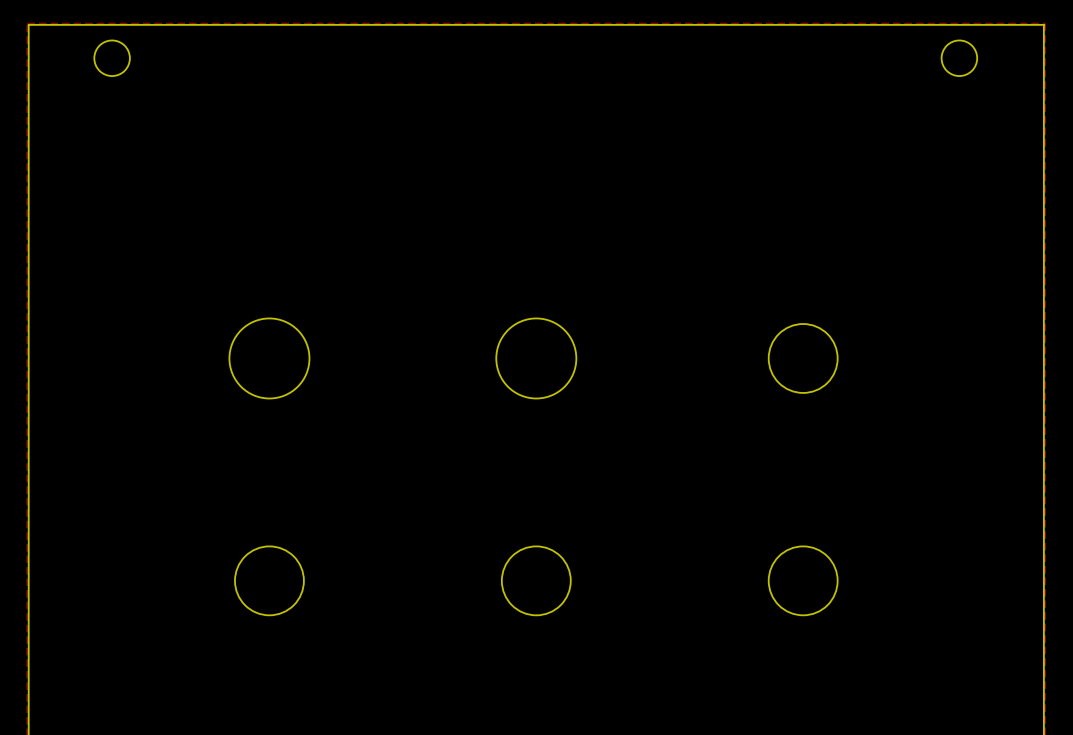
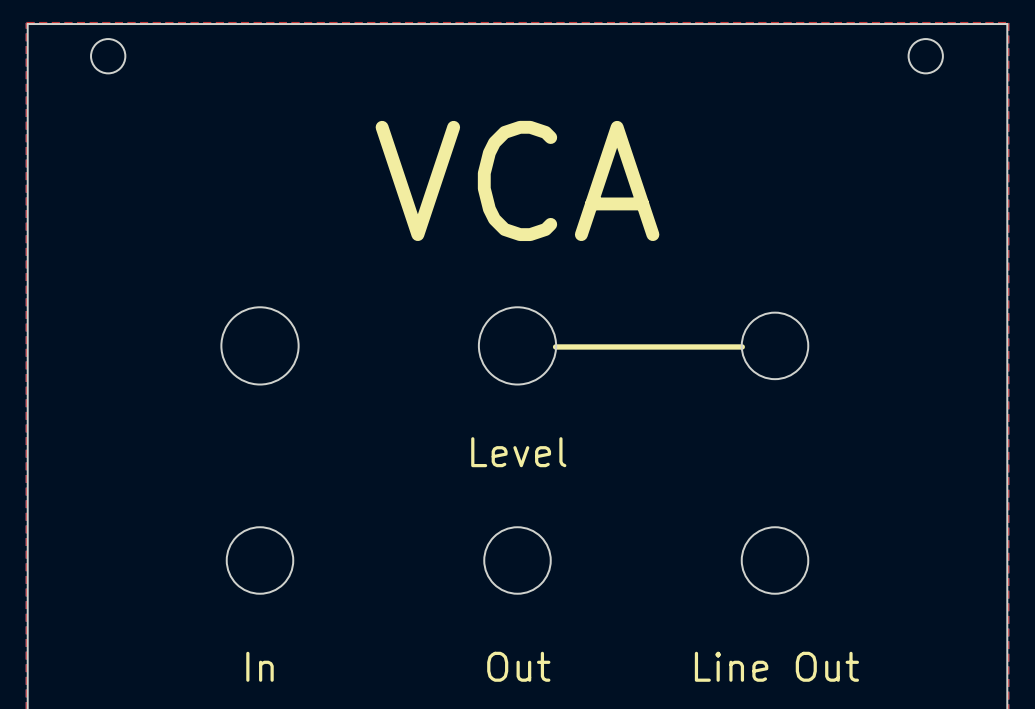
text: none -> VCA (517, 180)
line: none -> (555, 346) (742, 346)
text: none -> Level (518, 452)
text: none -> Line Out (776, 666)
text: none -> In (260, 666)
text: none -> Out (518, 666)

